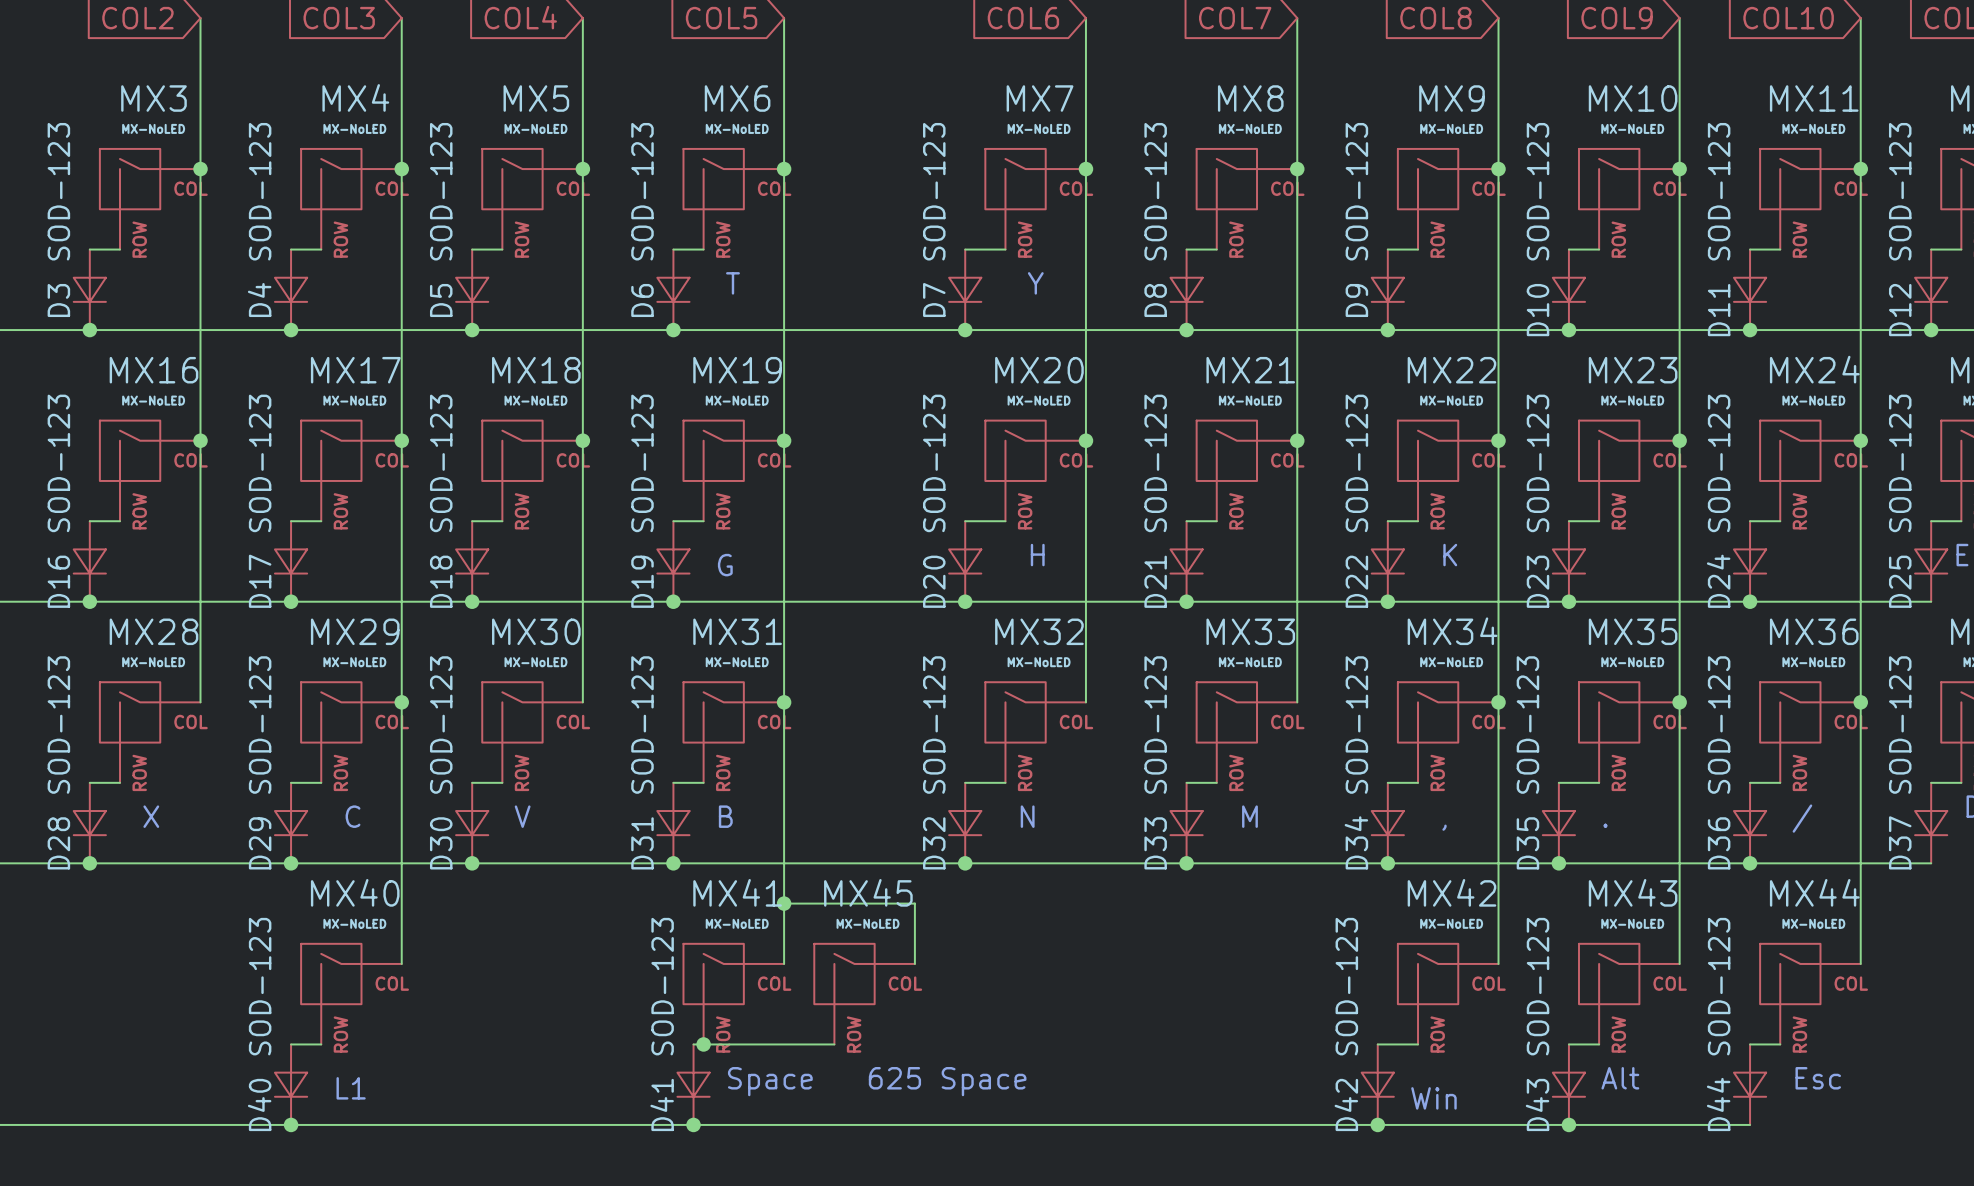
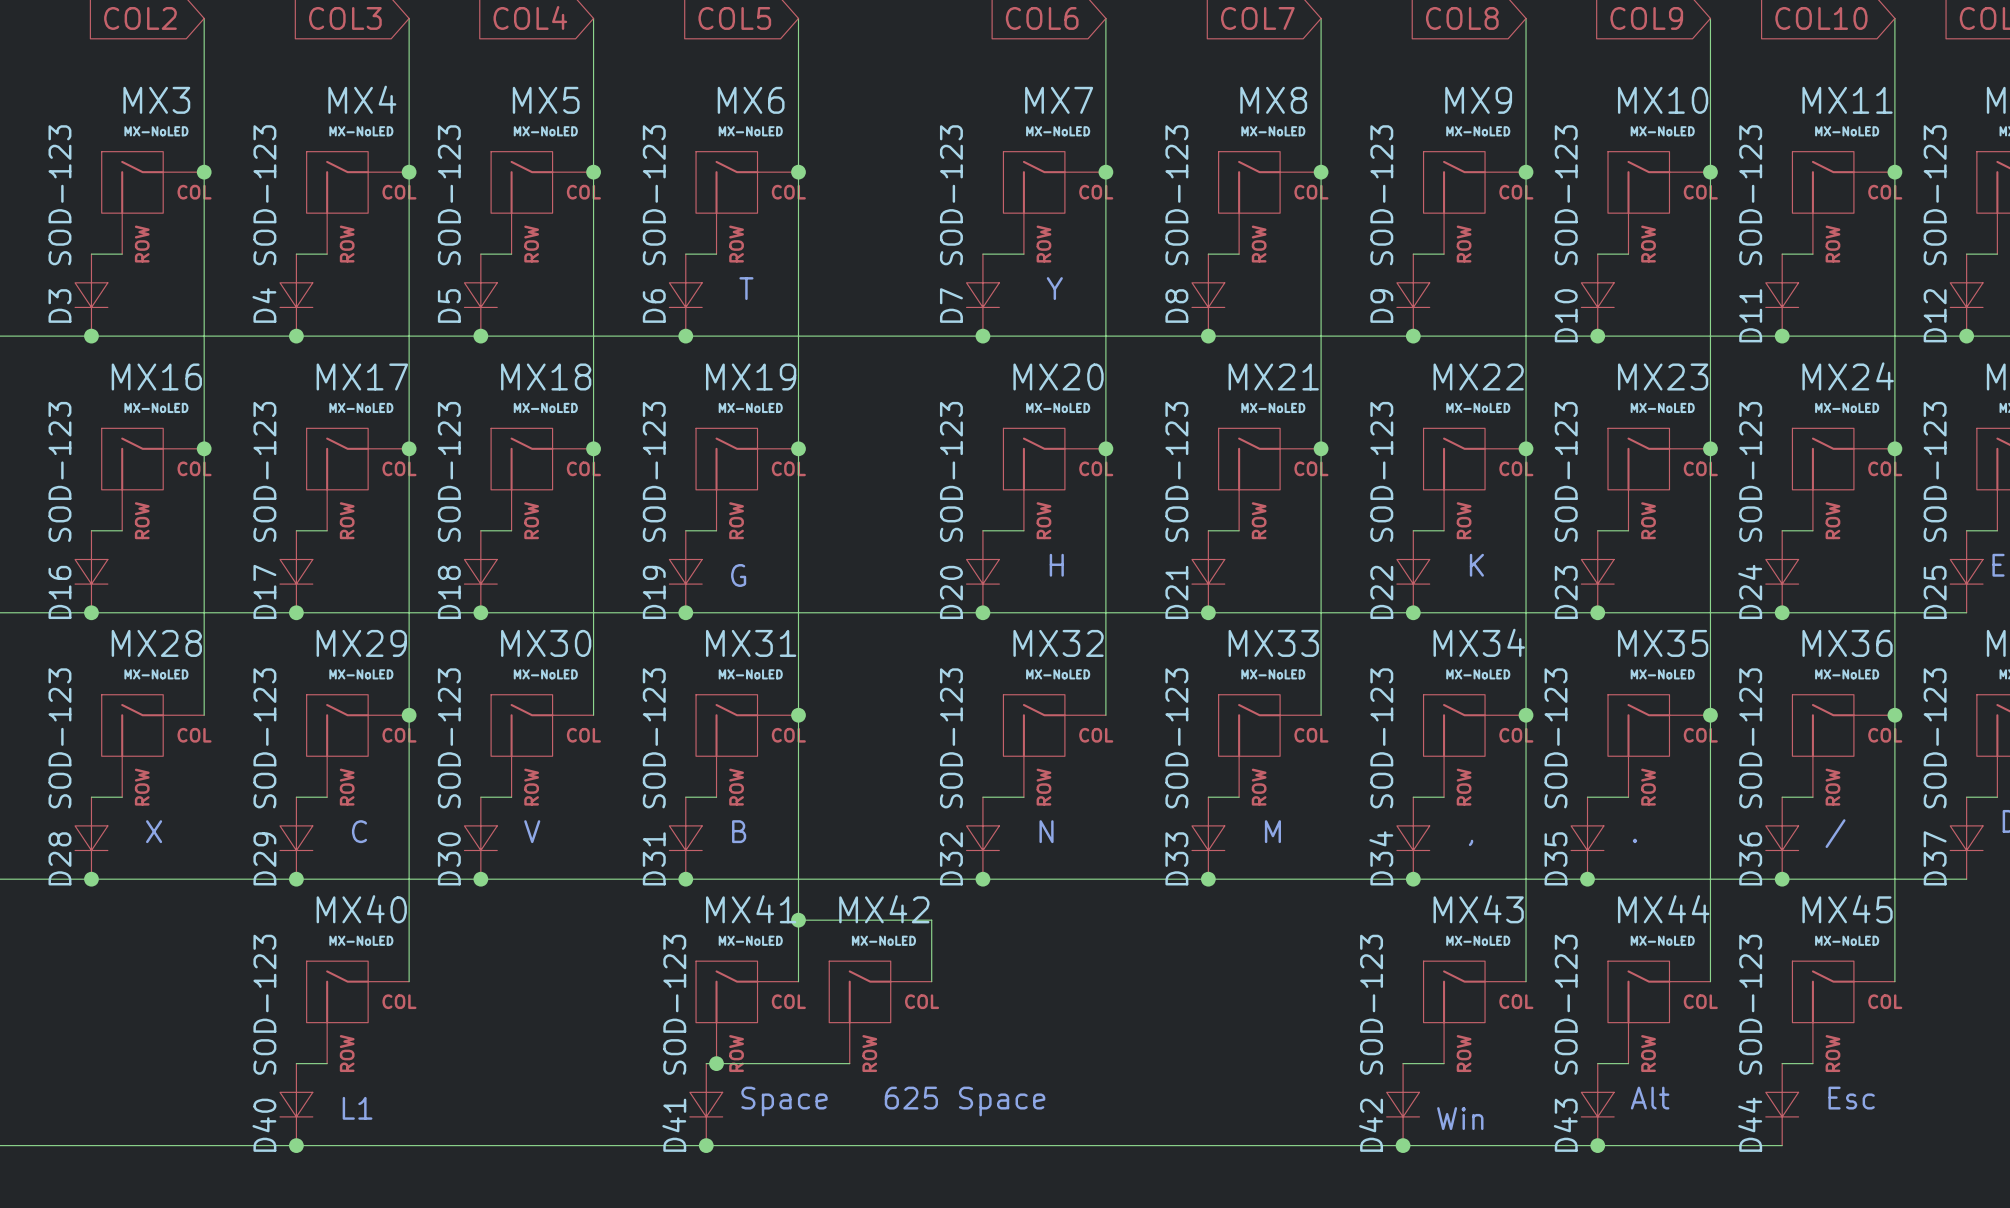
MX45 name: MX45 (868, 892) -> MX42 (884, 909)
MX42 name: MX42 (1451, 892) -> MX43 (1478, 909)
MX43 name: MX43 (1633, 892) -> MX44 (1663, 909)
MX44 name: MX44 (1814, 892) -> MX45 (1847, 909)

